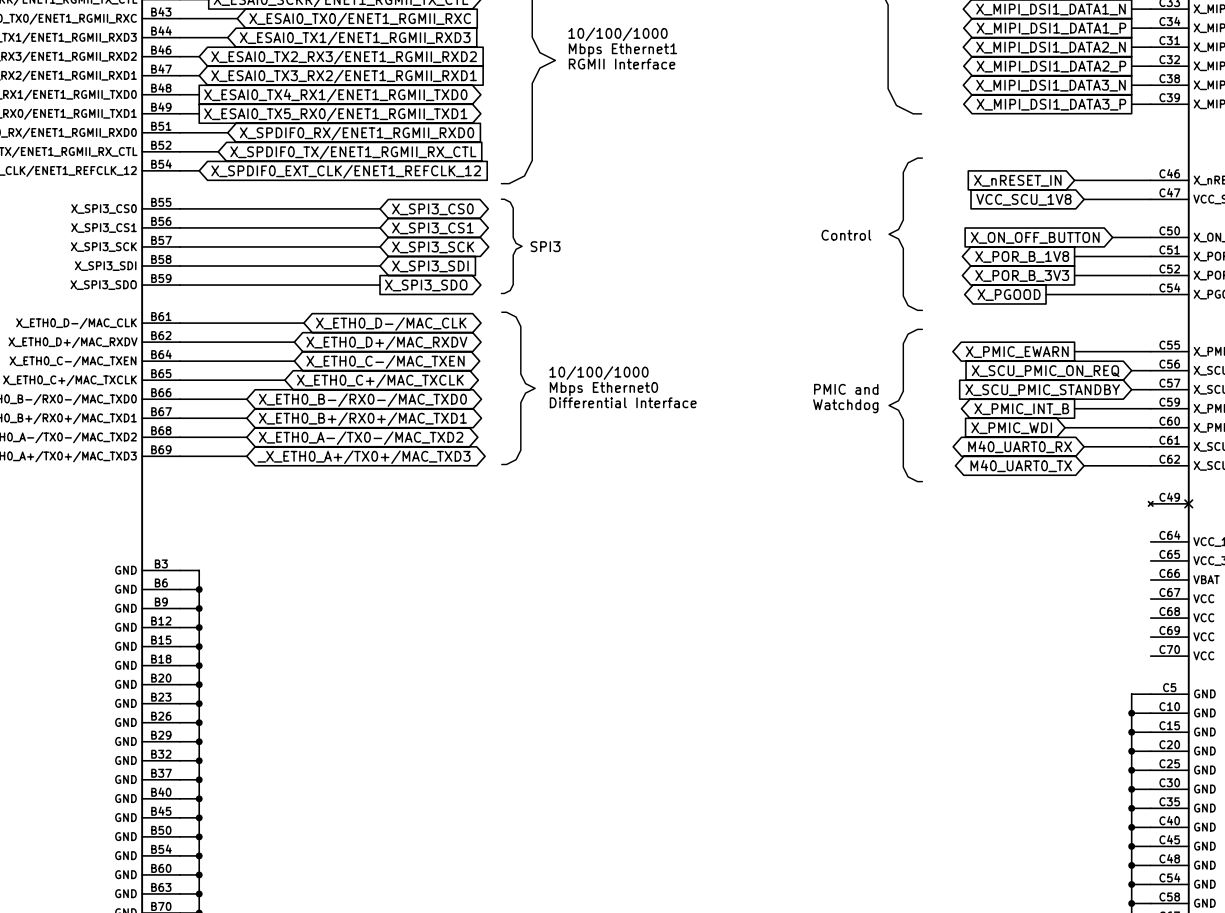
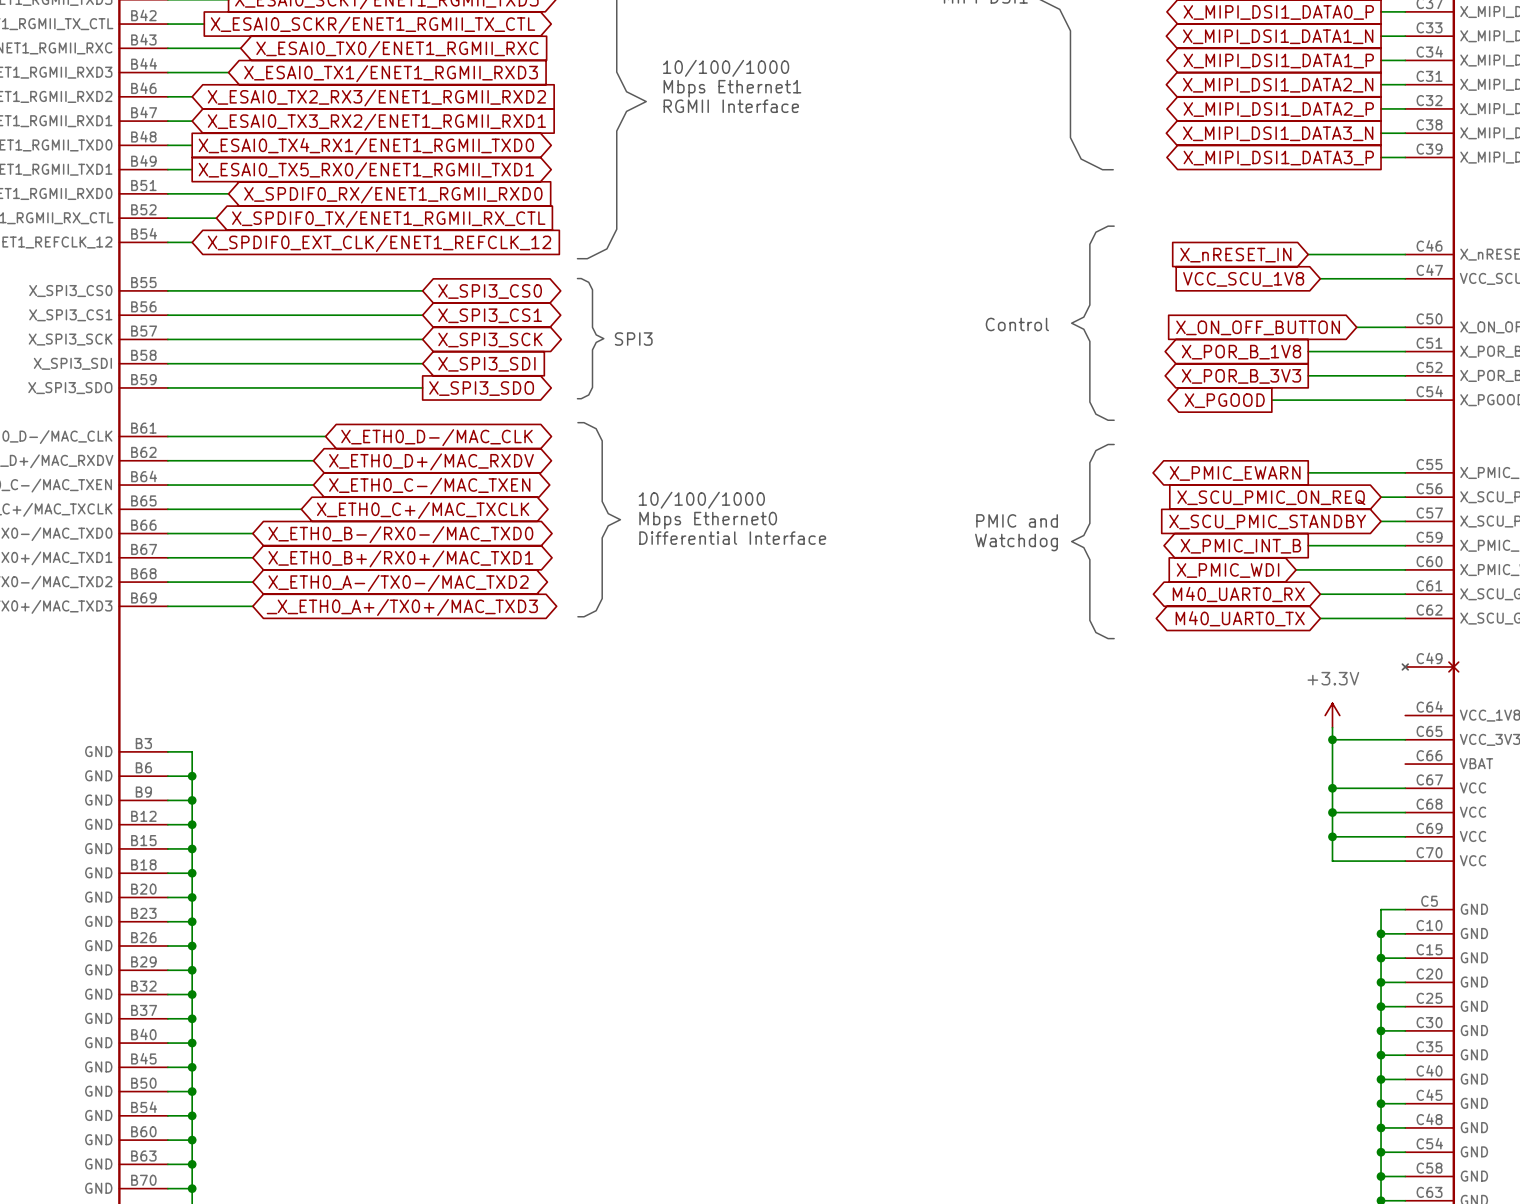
power symbol: none -> +3.3V (1332, 715)
wire: none -> (1332, 727) (1332, 861) (1405, 861)
wire: none -> (1332, 739) (1405, 739)
junction: none -> (1332, 739)
wire: none -> (1332, 788) (1405, 788)
junction: none -> (1332, 788)
wire: none -> (1332, 812) (1405, 812)
junction: none -> (1332, 812)
wire: none -> (1332, 836) (1405, 836)
junction: none -> (1332, 836)

